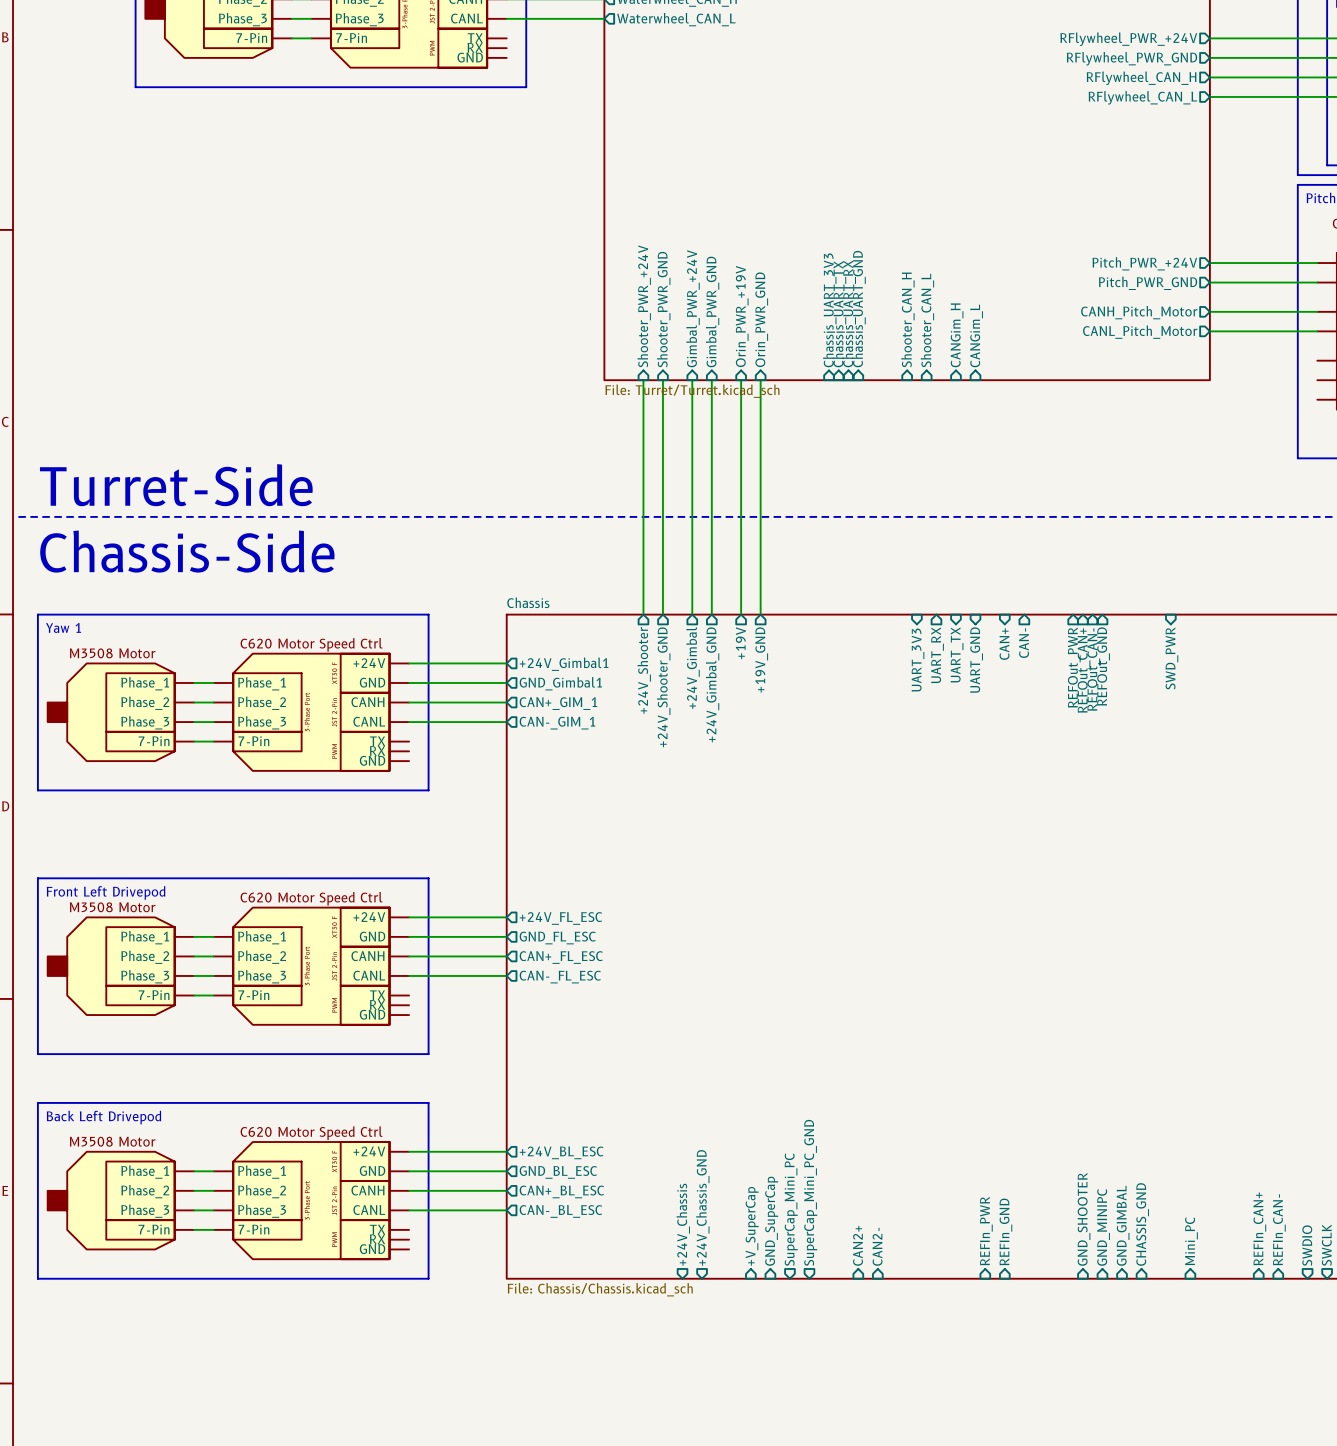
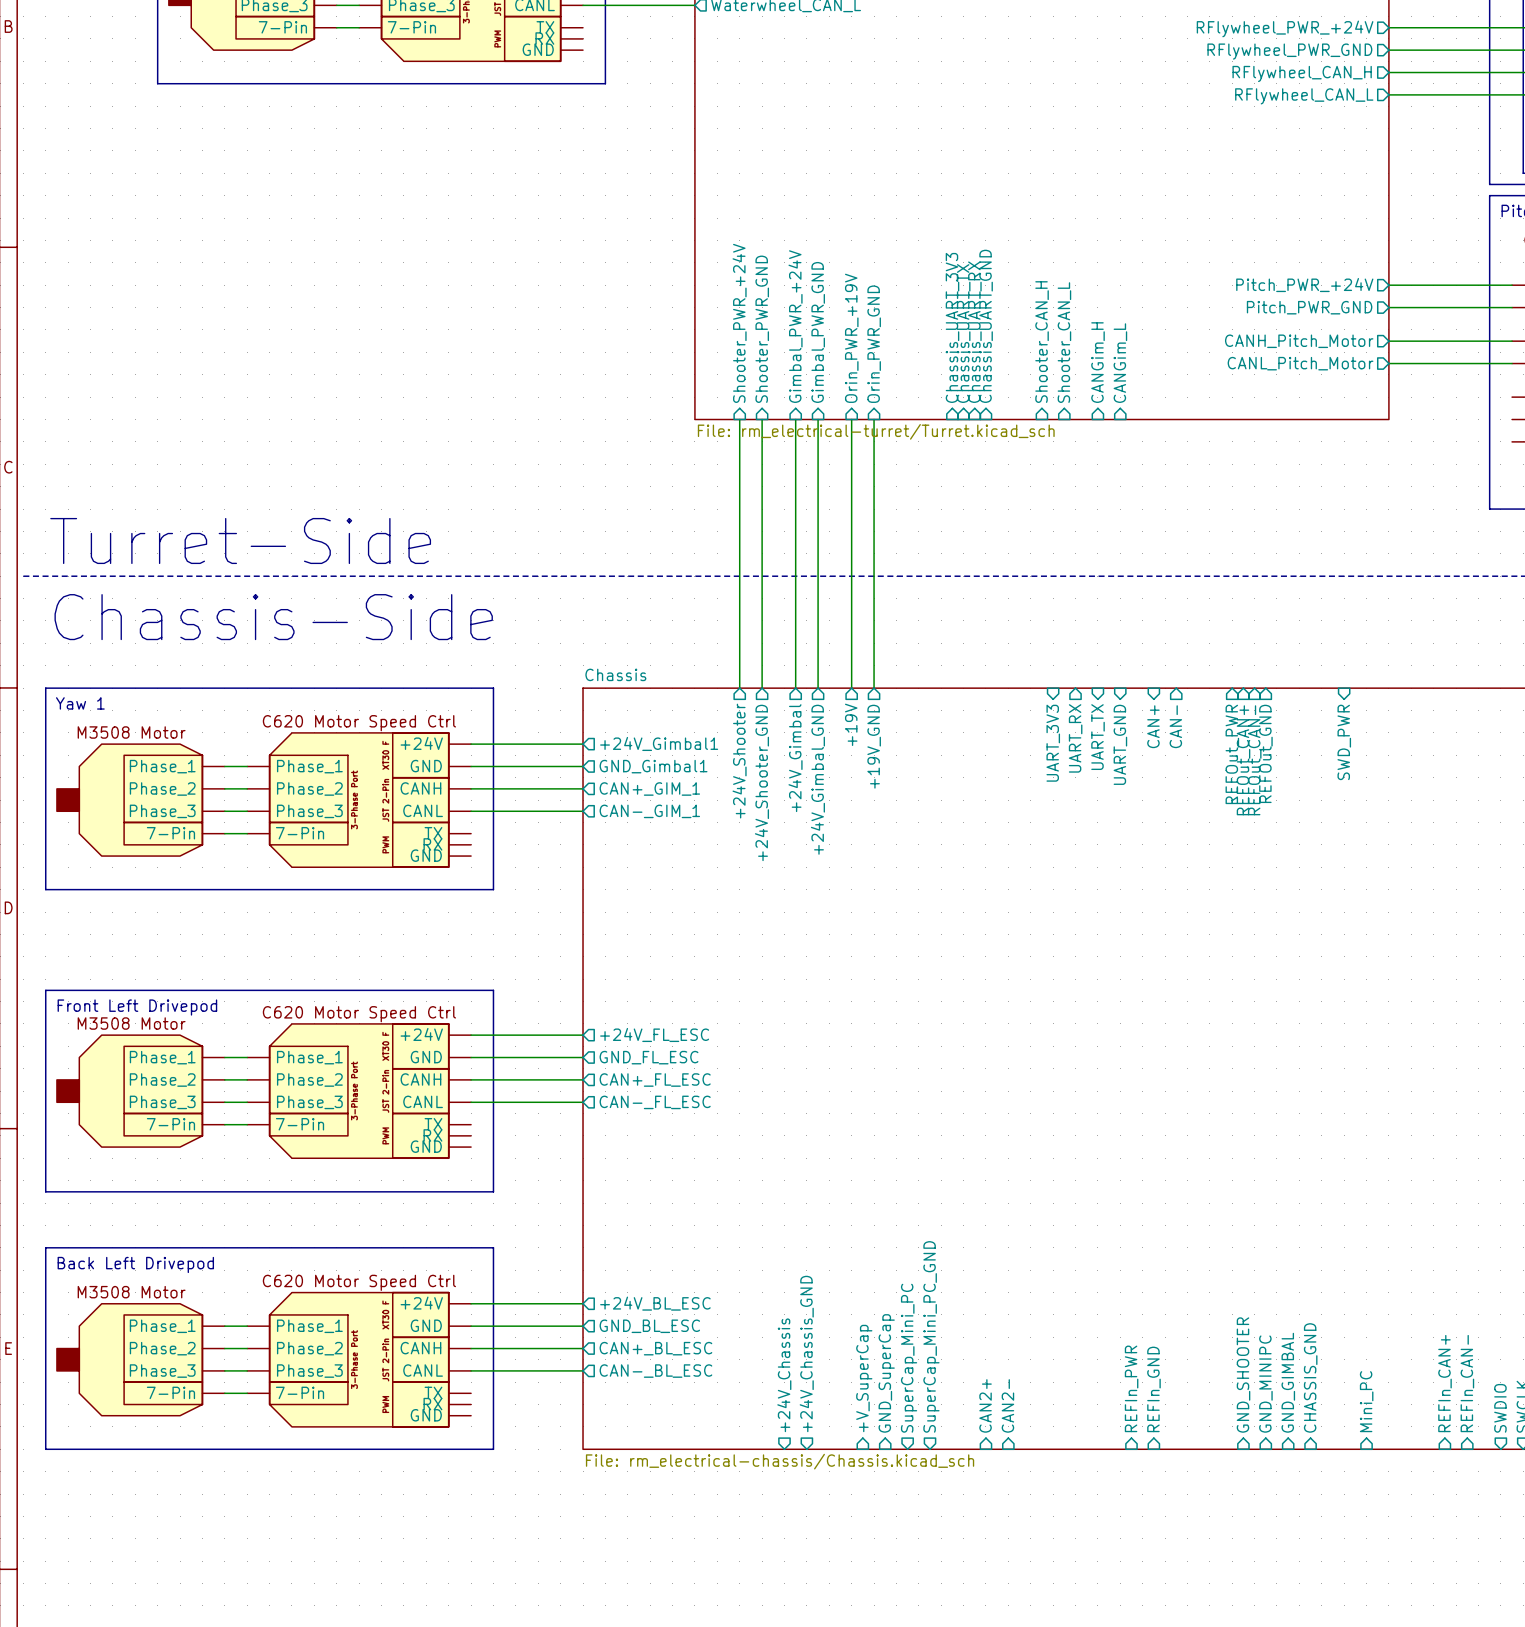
sheet value: File: Turret/Turret.kicad_sch (692, 391) -> File: rm_electrical-turret/Turret.kicad_sch (876, 431)
sheet Chassis value: File: Chassis/Chassis.kicad_sch (600, 1289) -> File: rm_electrical-chassis/Chassis.kicad_sch (780, 1461)

